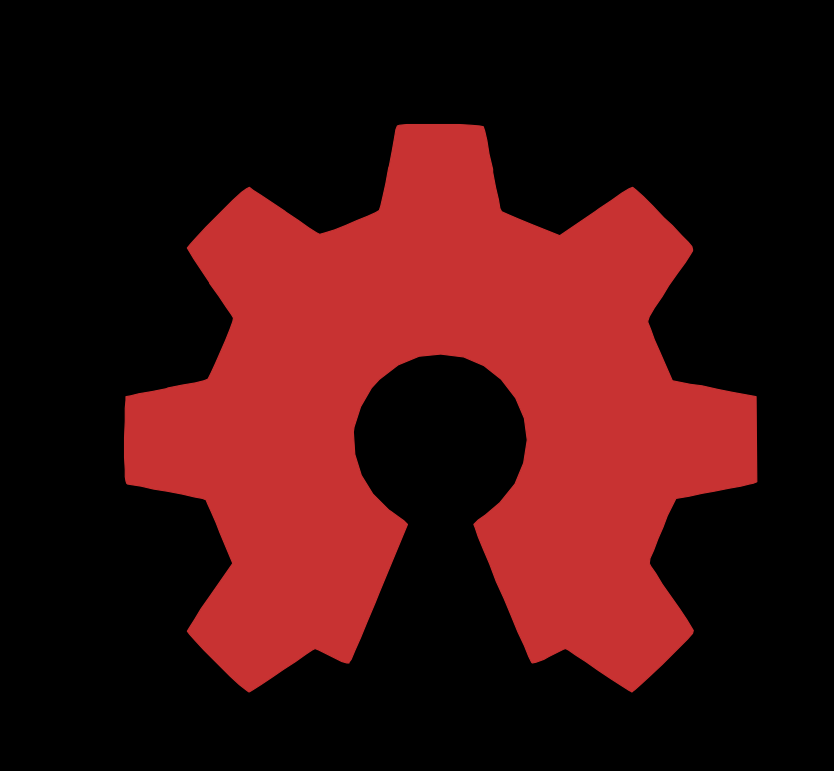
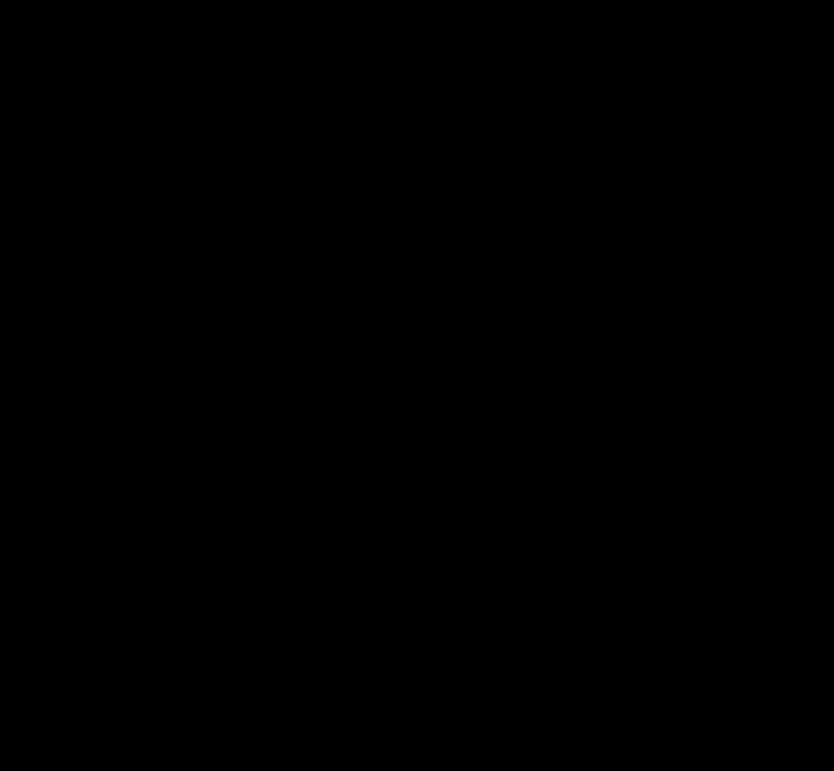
power symbol: (440, 408) -> none

